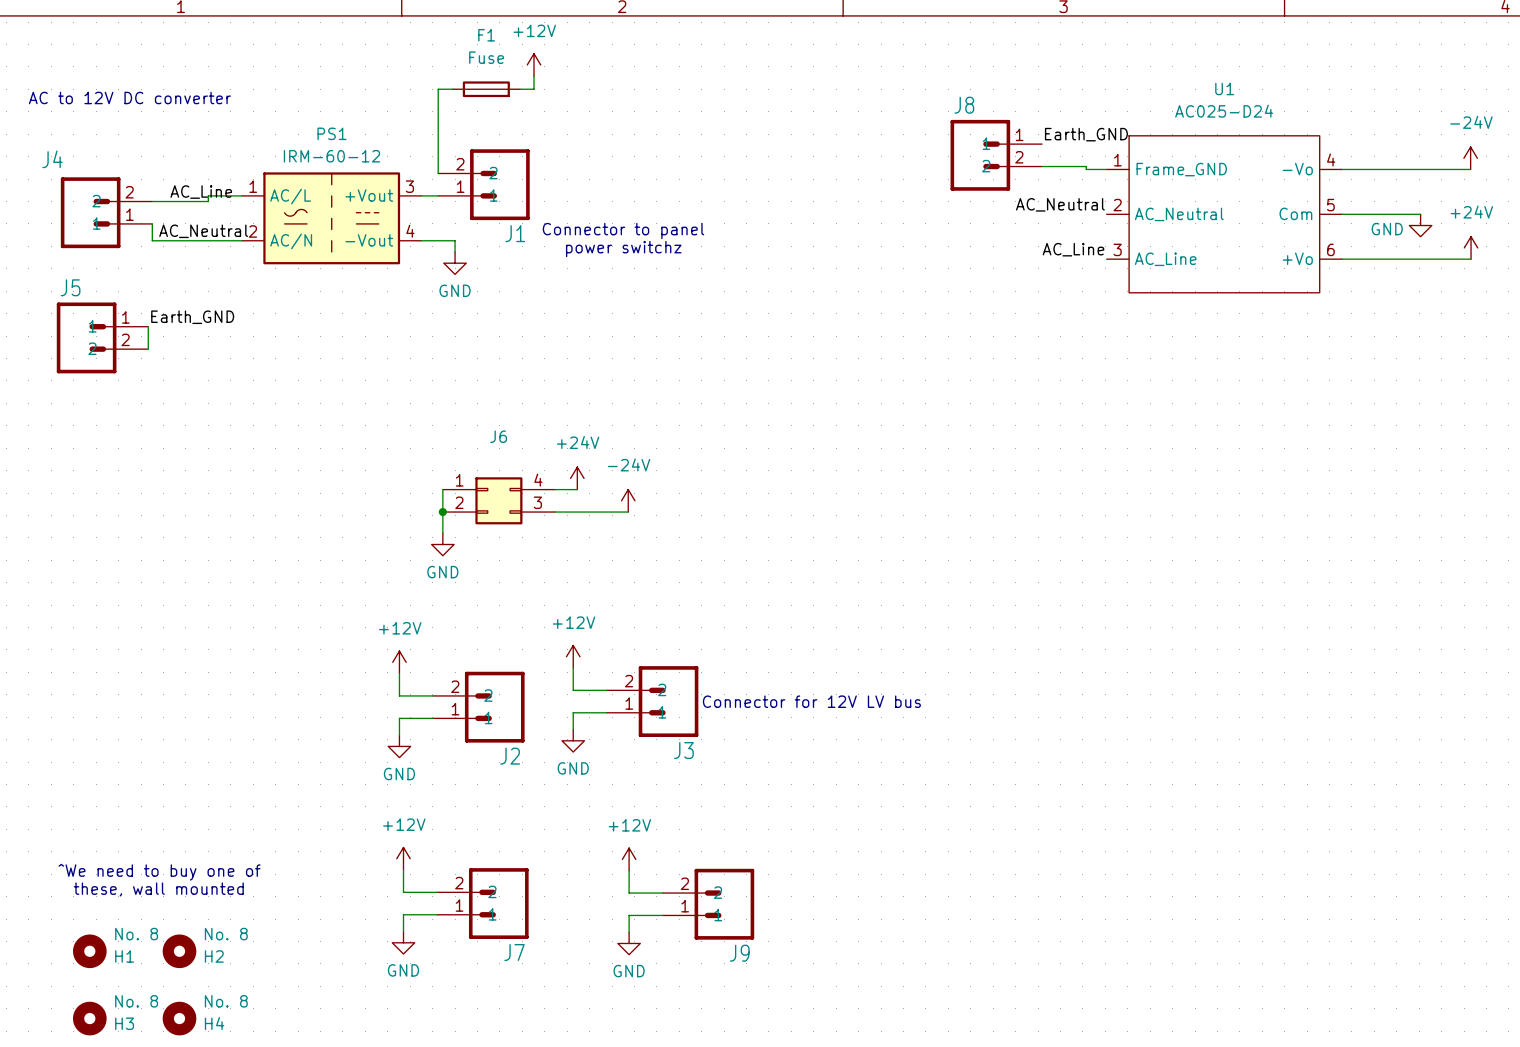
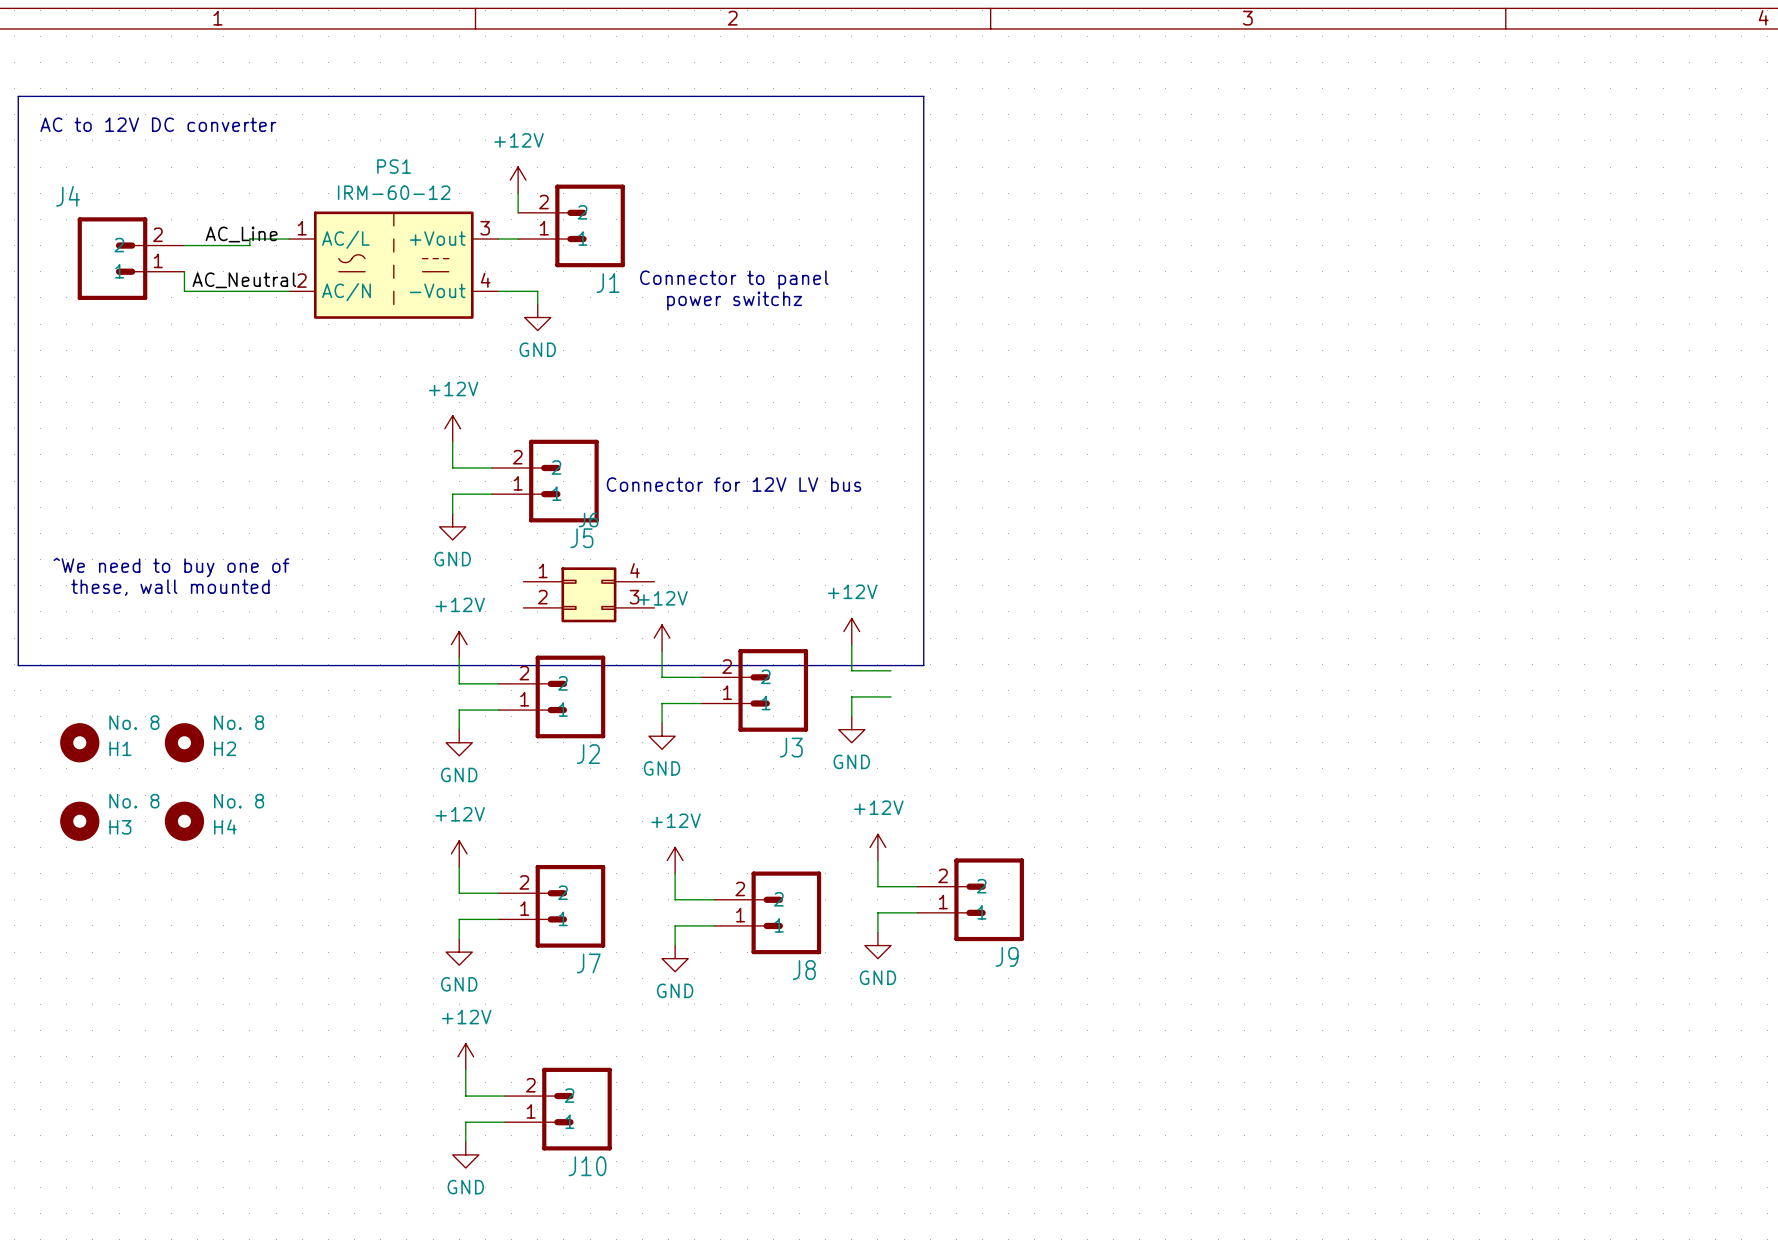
power symbol position: +12V (533, 64) -> +12V (518, 180)
line: none -> (18, 96) (923, 96) (923, 665) (18, 665) (18, 96)
wire: (533, 76) (533, 89) (519, 89) -> none
wire: (452, 89) (438, 89) (438, 156) -> none
F1: Fuse (486, 89) -> none
label: Earth_GND (1086, 134) -> none
J8 rotation: 0° (980, 155) -> 180° (786, 912)
J8 position: (996, 155) -> (767, 912)
power symbol: -24V (1470, 158) -> none
wire: (1042, 166) (1086, 166) (1086, 169) (1106, 169) -> none
wire: (1342, 169) (1470, 169) -> none
label: AC_Neutral (1060, 204) -> none
U1: AC025-D24 (1224, 214) -> none
wire: (1342, 214) (1420, 214) -> none
power symbol: GND (1420, 225) -> none
power symbol: +24V (1471, 247) -> none
label: AC_Line (1073, 249) -> none
wire: (1342, 259) (1471, 259) -> none
label: Earth_GND (192, 317) -> none
wire: (148, 326) (148, 349) -> none
J5 rotation: 0° (86, 337) -> 180° (563, 481)
J5 position: (102, 337) -> (545, 481)
power symbol: none -> +12V (452, 428)
wire: none -> (452, 441) (452, 467) (491, 467)
text: none -> Connector for 12V LV bus (734, 484)
wire: none -> (491, 494) (452, 494) (452, 513)
power symbol: none -> GND (452, 526)
text: none -> ^We need to buy one of (171, 567)
power symbol: +24V (577, 478) -> none
wire: (442, 489) (442, 533) -> none
wire: (554, 489) (577, 489) -> none
text: none -> these, wall mounted (170, 587)
power symbol: -24V (628, 500) -> none
junction: (442, 512) -> none
wire: (554, 512) (628, 512) -> none
power symbol: none -> +12V (851, 631)
power symbol: none -> +12V (662, 638)
power symbol: none -> +12V (459, 644)
wire: none -> (851, 644) (851, 670) (891, 670)
power symbol: GND (442, 544) -> none
wire: none -> (891, 696) (851, 696) (851, 716)
power symbol: none -> GND (851, 729)
power symbol: none -> GND (662, 736)
power symbol: none -> GND (459, 742)
power symbol: +12V (573, 656) -> none
power symbol: +12V (399, 662) -> none
wire: (573, 667) (573, 690) (606, 690) -> (662, 651) (662, 677) (701, 677)
wire: (399, 673) (399, 695) (433, 695) -> (459, 657) (459, 683) (498, 683)
J3 position: (652, 701) -> (754, 690)
text: Connector for 12V LV bus (811, 701) -> none
J2 position: (478, 707) -> (551, 696)
wire: (606, 712) (573, 712) (573, 729) -> (701, 703) (662, 703) (662, 723)
power symbol: none -> +12V (877, 847)
wire: (433, 718) (399, 718) (399, 735) -> (498, 710) (459, 710) (459, 729)
power symbol: none -> +12V (459, 853)
power symbol: none -> +12V (675, 860)
wire: none -> (877, 860) (877, 886) (917, 886)
wire: none -> (459, 867) (459, 893) (498, 893)
power symbol: GND (573, 740) -> none
power symbol: GND (399, 746) -> none
wire: none -> (917, 912) (877, 912) (877, 932)
wire: none -> (498, 919) (459, 919) (459, 939)
power symbol: none -> GND (877, 945)
power symbol: none -> GND (459, 952)
power symbol: none -> GND (675, 958)
power symbol position: +12V (403, 858) -> +12V (465, 1056)
power symbol: +12V (629, 859) -> none
wire: (403, 869) (403, 892) (437, 892) -> (465, 1069) (465, 1096) (505, 1096)
wire: (629, 870) (629, 893) (662, 893) -> (675, 873) (675, 899) (714, 899)
text: ^We need to buy one of (159, 872) -> none
text: these, wall mounted (158, 889) -> none
J7 position: (482, 903) -> (551, 906)
J9 position: (708, 904) -> (970, 899)
wire: (437, 914) (403, 914) (403, 931) -> (505, 1122) (465, 1122) (465, 1141)
wire: (662, 915) (629, 915) (629, 932) -> (714, 925) (675, 925) (675, 945)
J10: none -> (558, 1109)
power symbol position: GND (403, 942) -> GND (465, 1154)
power symbol: GND (629, 943) -> none
H1 position: (89, 951) -> (79, 742)
H2 position: (179, 951) -> (184, 742)
H3 position: (89, 1018) -> (79, 821)
H4 position: (179, 1018) -> (184, 821)

